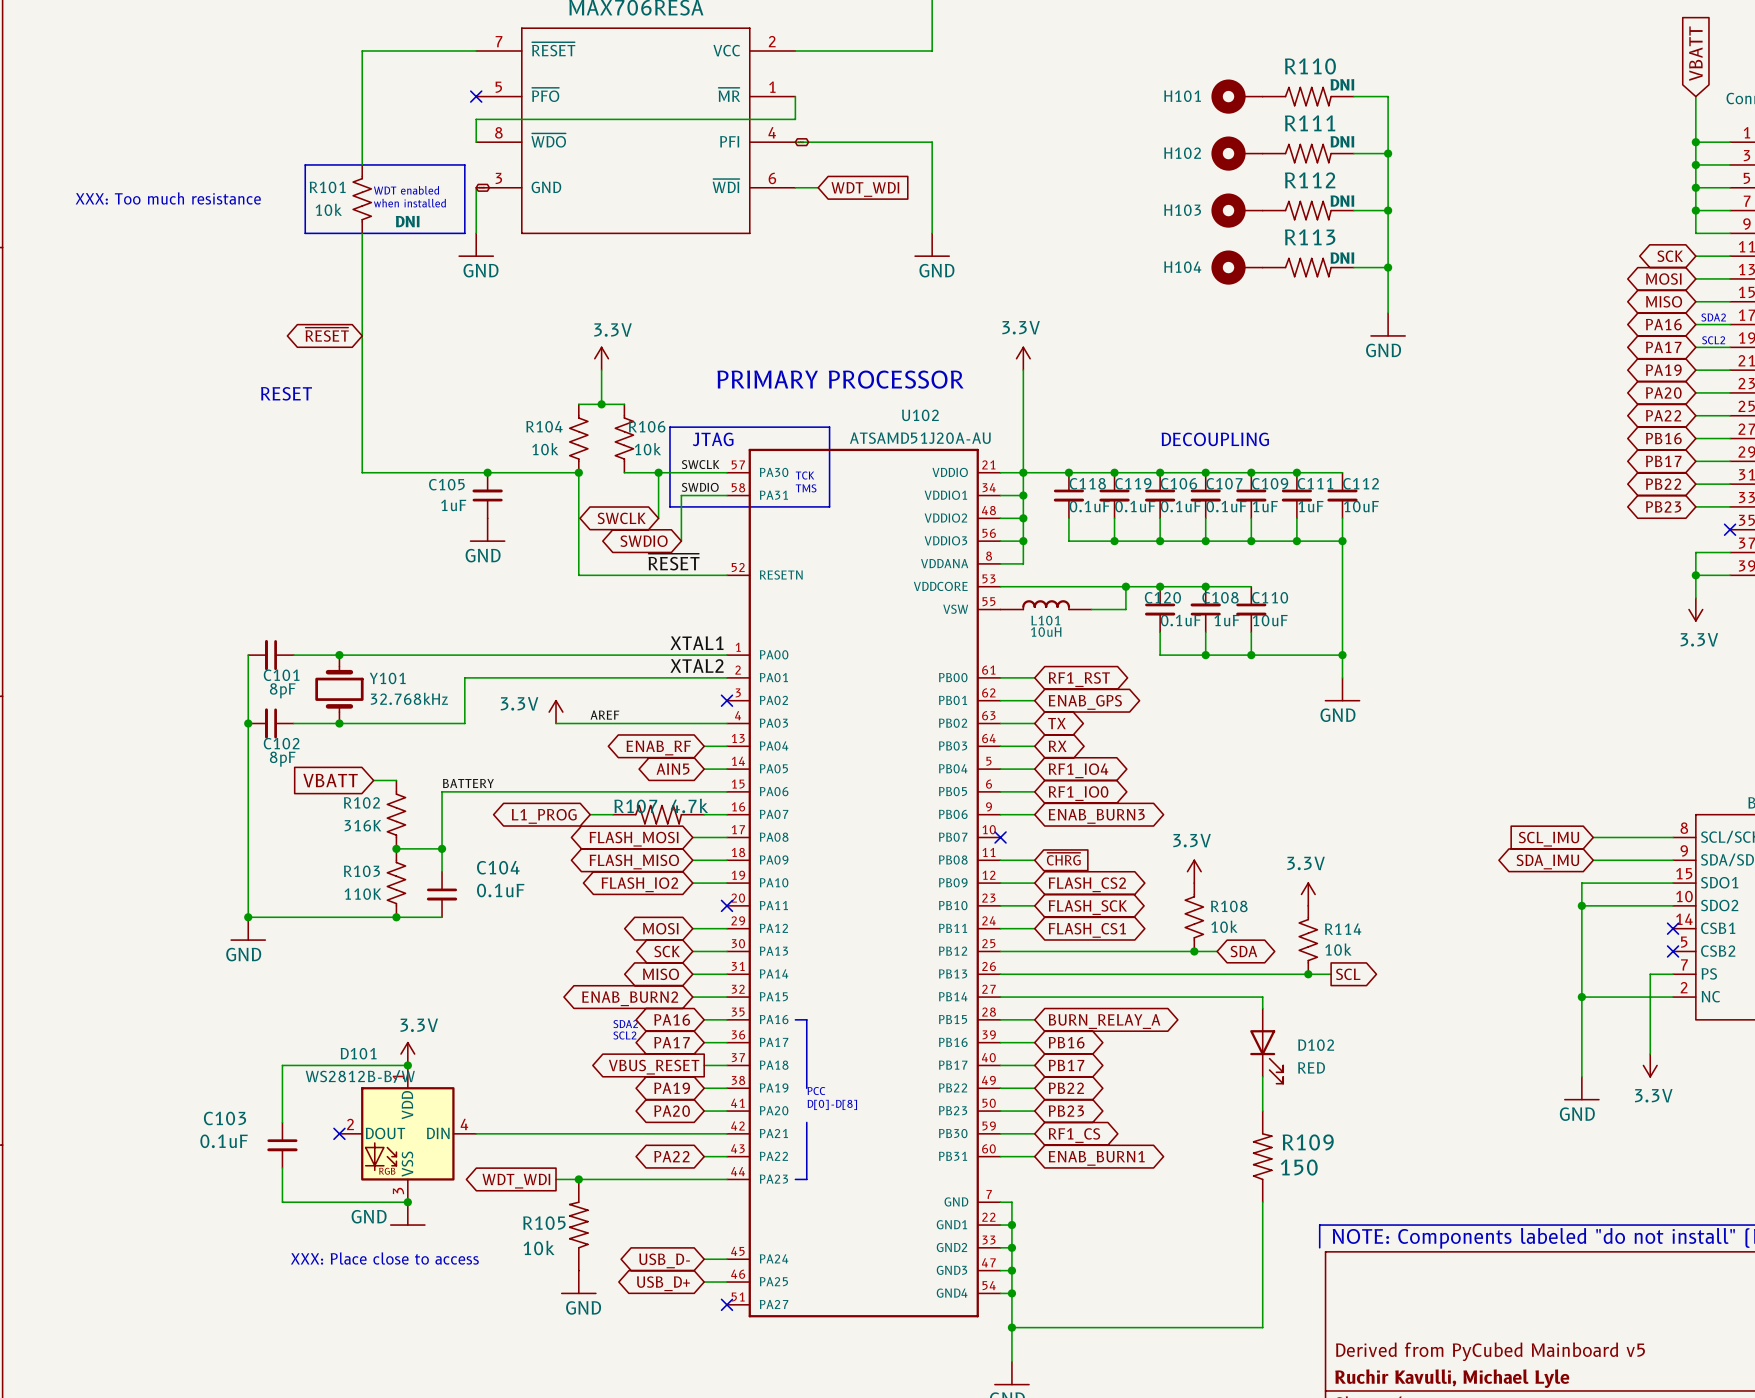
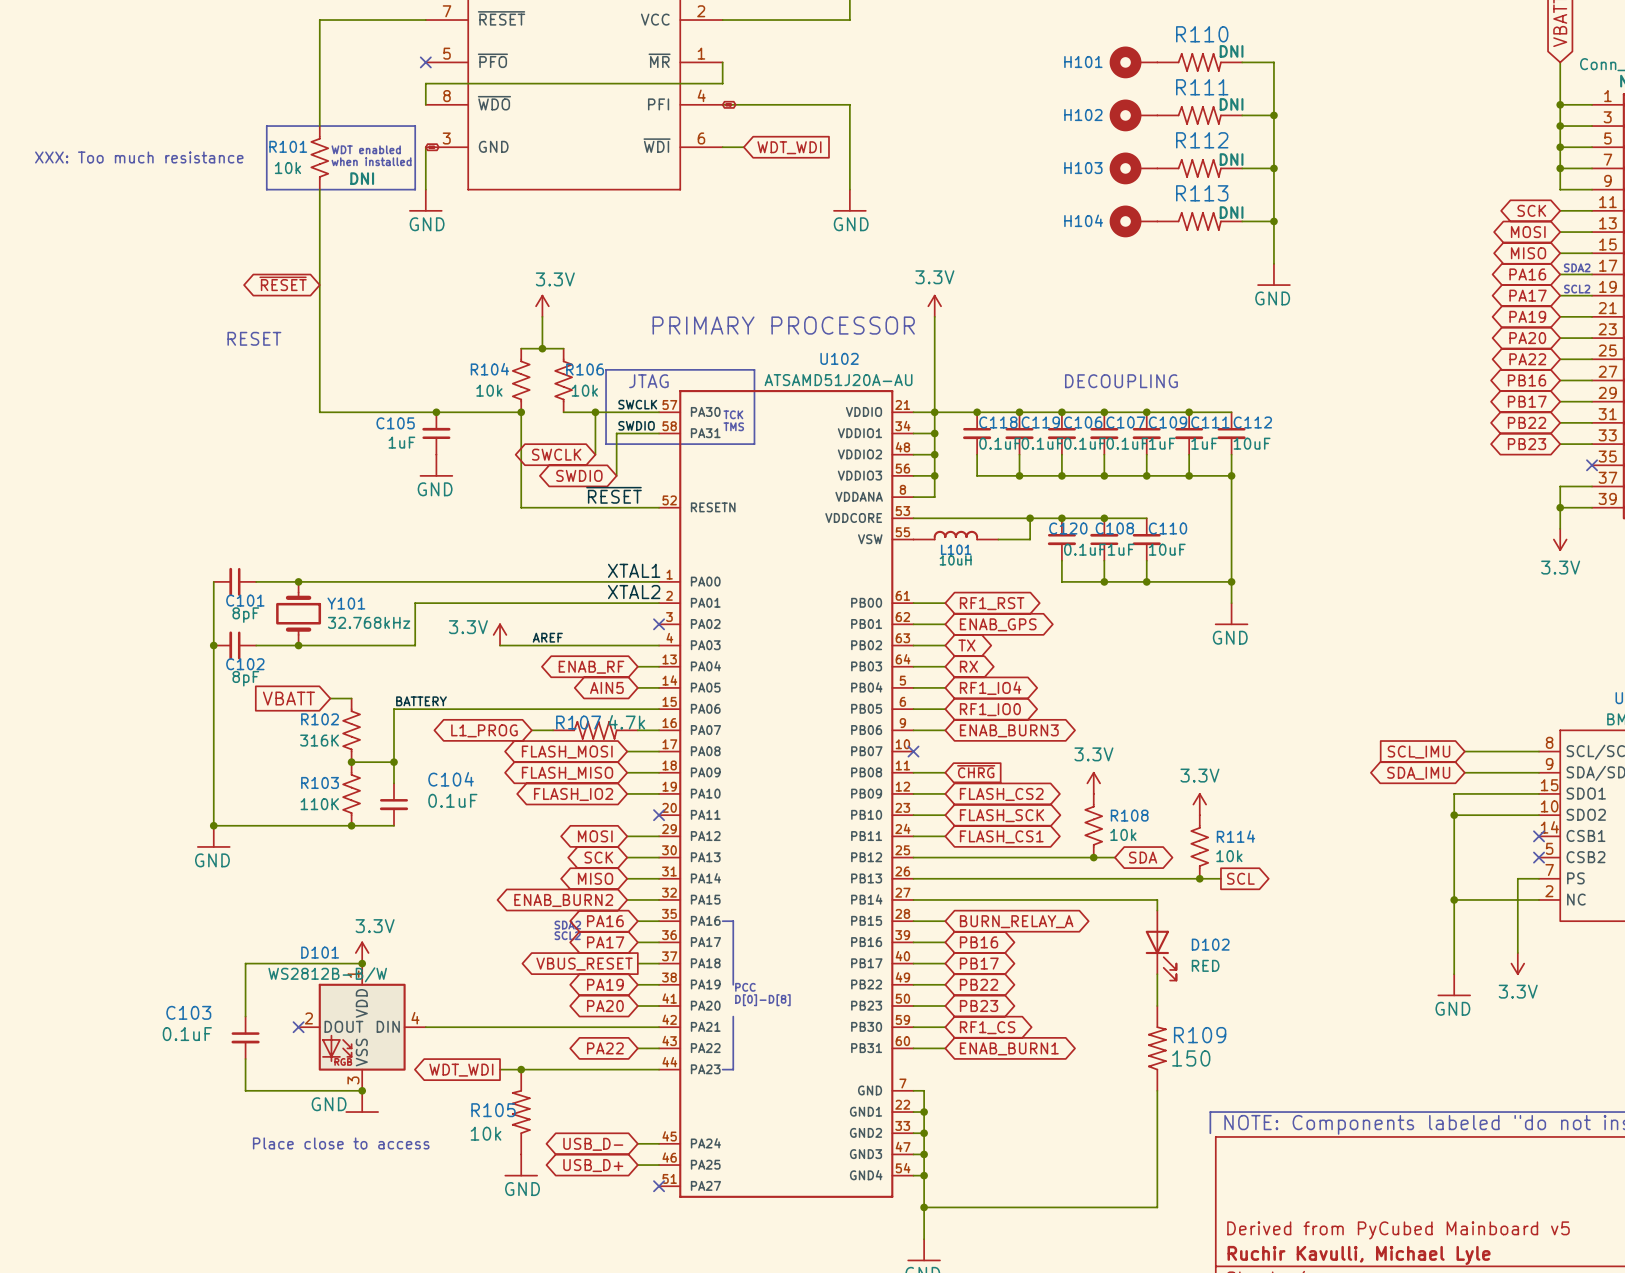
text: XXX: Place close to access (384, 1258) -> Place close to access (341, 1143)

